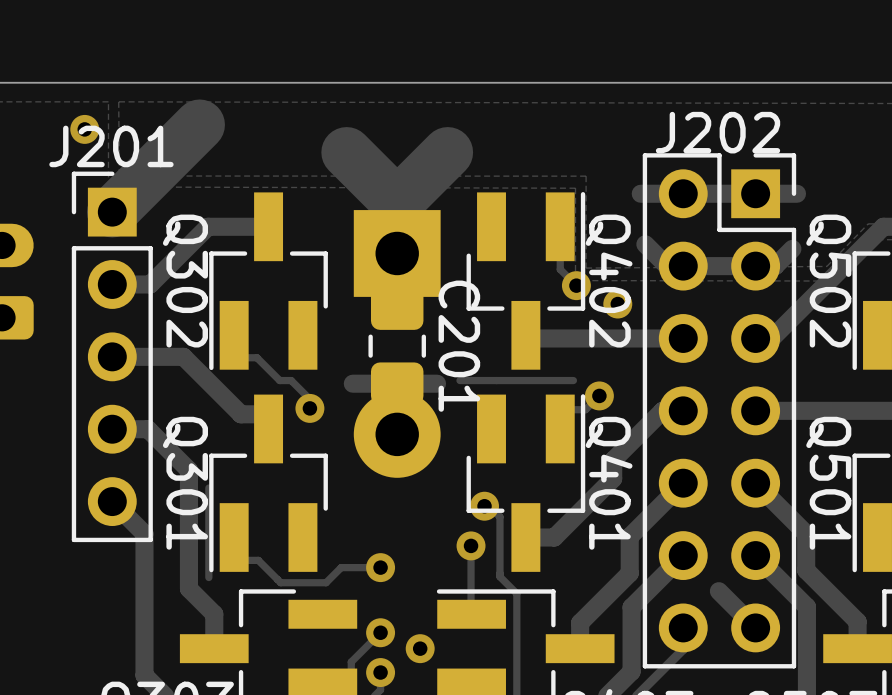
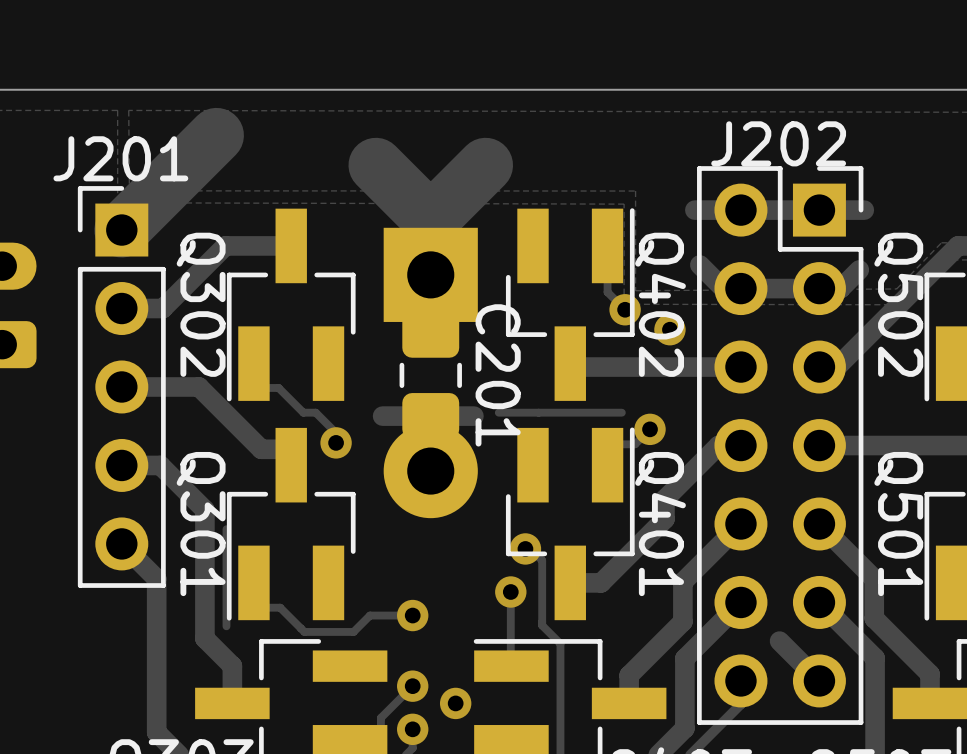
via: (84, 129) -> none

